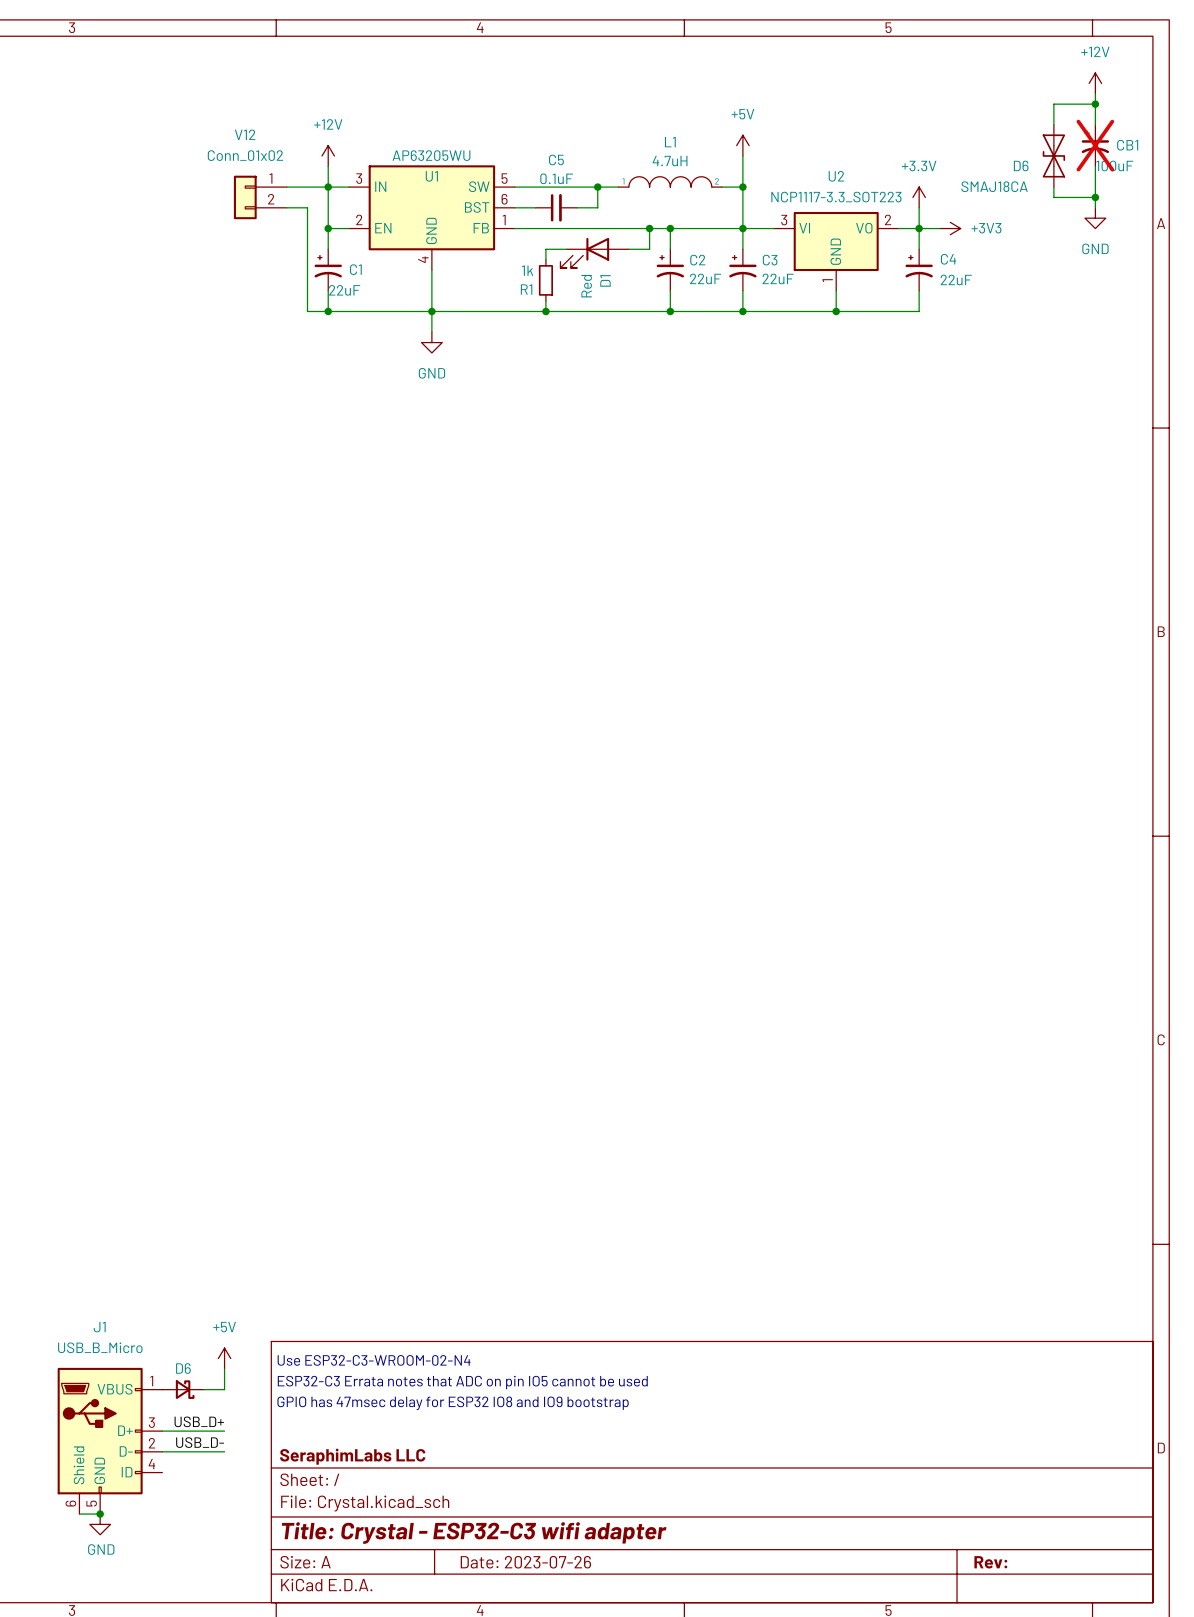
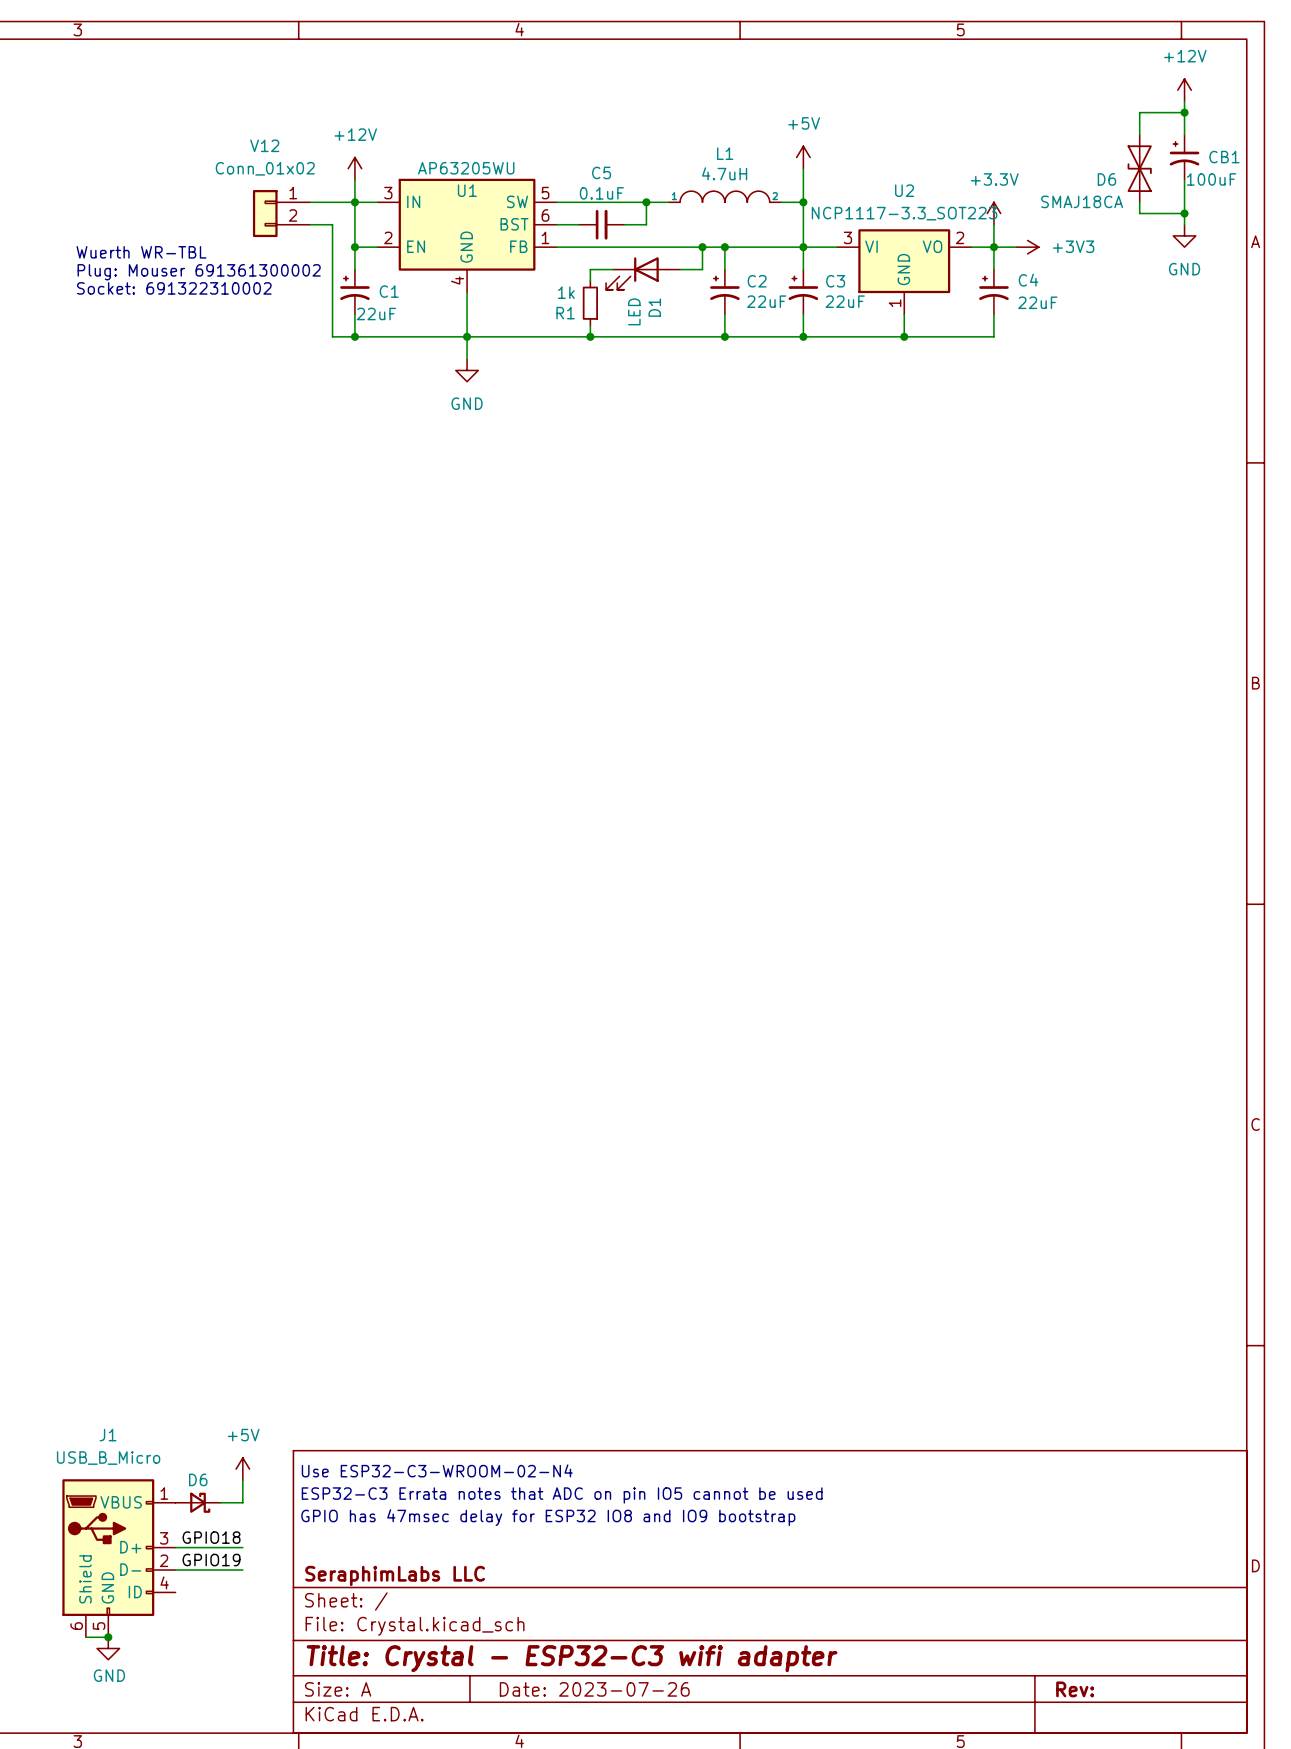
CB1 do-not-place cross: (1095, 145) -> none
text: none -> Wuerth WR-TBL (141, 252)
text: none -> Plug: Mouser 691361300002 (199, 272)
text: none -> Socket: 691322310002 (174, 288)
D1 value: Red (586, 286) -> LED (634, 311)
label: USB_D+ (199, 1421) -> GPIO18 (211, 1537)
label: USB_D- (200, 1442) -> GPIO19 (211, 1560)

